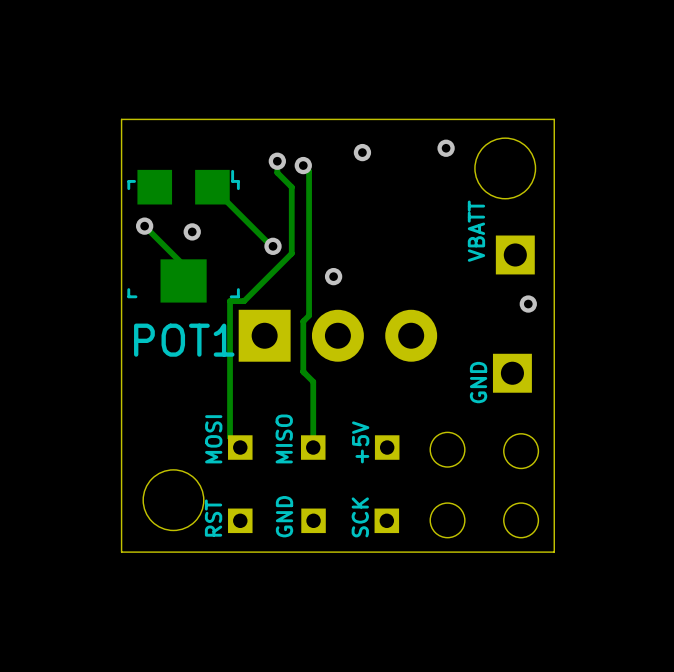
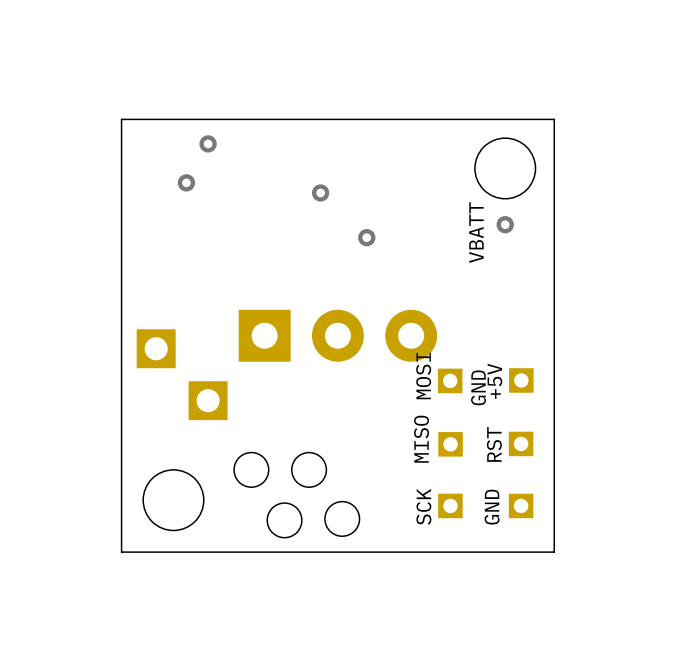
via: none -> (208, 143)
via: (446, 148) -> none
via: (362, 152) -> none
track: (277, 161) (277, 172) (291, 187) (291, 253) (244, 301) (230, 301) (230, 437) (240, 447) -> none
via: (277, 161) -> none
track: (303, 165) (309, 171) (309, 315) (303, 321) (303, 371) (313, 381) (313, 447) -> none
via: (303, 165) -> none
via: none -> (186, 182)
track: (212, 187) (273, 246) -> none
via: none -> (320, 192)
via: none -> (505, 224)
track: (144, 226) (183, 265) (183, 280) -> none
via: (144, 226) -> none
via: (192, 231) -> none
POT1: (183, 236) -> none
via: none -> (366, 237)
via: (273, 246) -> none
part: (515, 254) -> none
via: (333, 276) -> none
via: (528, 304) -> none
part: none -> (156, 348)
part footprint: [492, 353, 532, 393] -> [509, 368, 534, 393]
part: none -> (450, 380)
part: none -> (208, 400)
round board edge: [429, 431, 466, 468] -> none
round board edge: [503, 433, 540, 470] -> none
text position: MISO (284, 438) -> MISO (421, 439)
text position: MOSI (213, 439) -> MOSI (423, 376)
text position: +5V (360, 442) -> +5V (494, 381)
part: none -> (521, 443)
part: none -> (450, 444)
part: (240, 447) -> none
part: (313, 447) -> none
part: (387, 447) -> none
round board edge: none -> [233, 451, 270, 488]
round board edge: none -> [291, 451, 328, 488]
round board edge: none -> [324, 500, 361, 537]
round board edge: none -> [266, 502, 303, 539]
round board edge: [429, 502, 466, 539] -> none
round board edge: [503, 502, 540, 539] -> none
part: none -> (450, 505)
part: none -> (521, 505)
text position: GND (284, 516) -> GND (492, 507)
text position: SCK (360, 517) -> SCK (423, 506)
text position: RST (213, 518) -> RST (494, 444)
part: (240, 520) -> none
part: (313, 520) -> none
part: (386, 520) -> none

